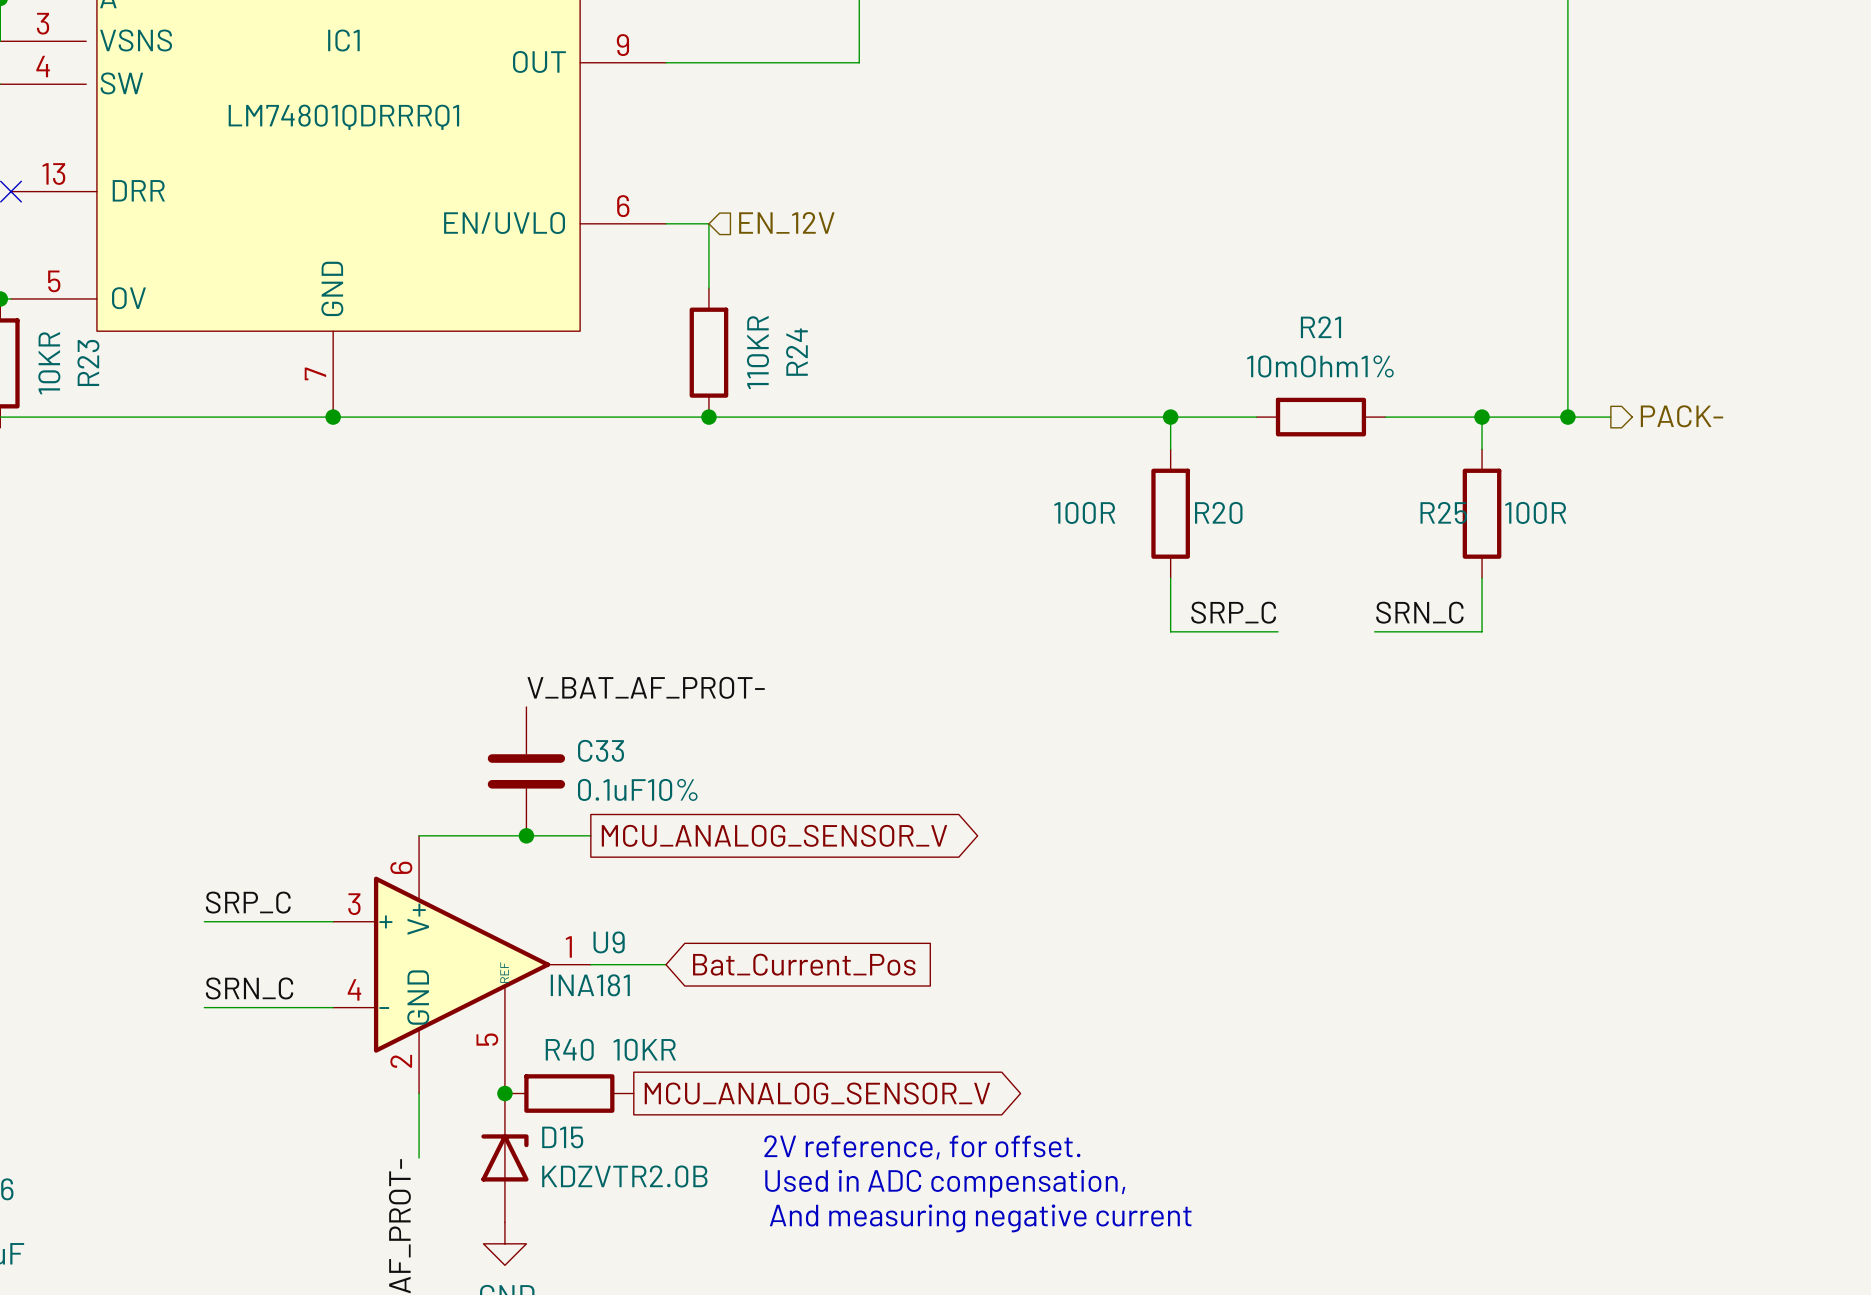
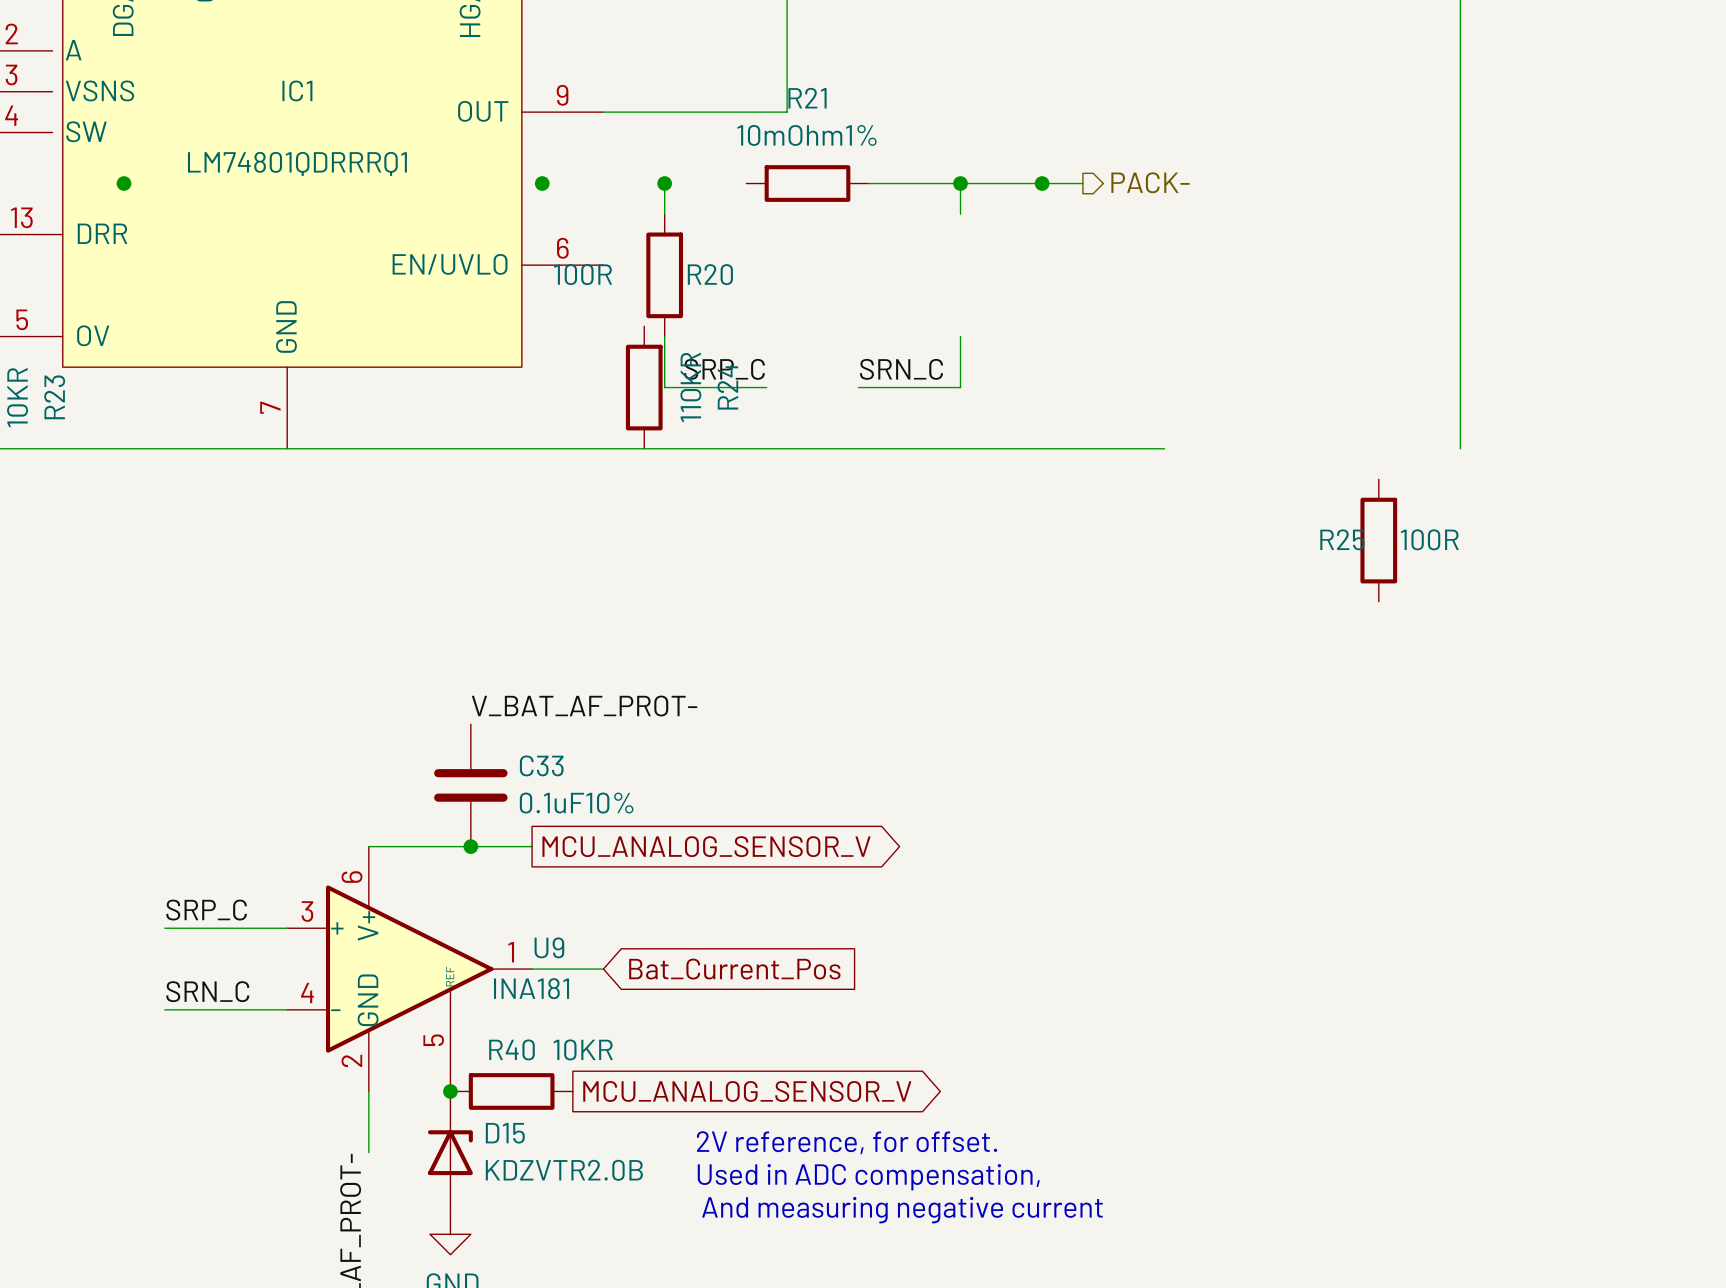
junction: none -> (123, 183)
junction: none -> (542, 183)
wire: none -> (664, 183) (664, 214)
junction: none -> (664, 183)
wire: none -> (868, 183) (1082, 183)
junction: none -> (960, 183)
junction: none -> (1042, 183)
hierarchical label: none -> PACK- (1150, 182)
hierarchical label: EN_12V (786, 222) -> none
wire: (666, 223) (708, 223) (708, 288) -> none
wire: none -> (664, 336) (664, 387) (766, 387)
wire: none -> (960, 336) (960, 387) (858, 387)
label: none -> SRP_C (724, 369)
label: none -> SRN_C (901, 369)
hierarchical label: PACK- (1681, 416) -> none
junction: (333, 417) -> none
junction: (708, 417) -> none
wire: (1170, 417) (1170, 449) -> (960, 183) (960, 214)
junction: (1170, 417) -> none
R21 position: (1320, 417) -> (807, 183)
wire: (1385, 417) (1610, 417) -> none
wire: (1482, 417) (1482, 449) -> none
junction: (1482, 417) -> none
junction: (1567, 417) -> none
R20 position: (1170, 513) -> (664, 275)
wire: (1170, 578) (1170, 631) (1278, 631) -> none
wire: (1482, 578) (1482, 631) (1374, 631) -> none
label: SRP_C (1233, 612) -> none
label: SRN_C (1419, 612) -> none

